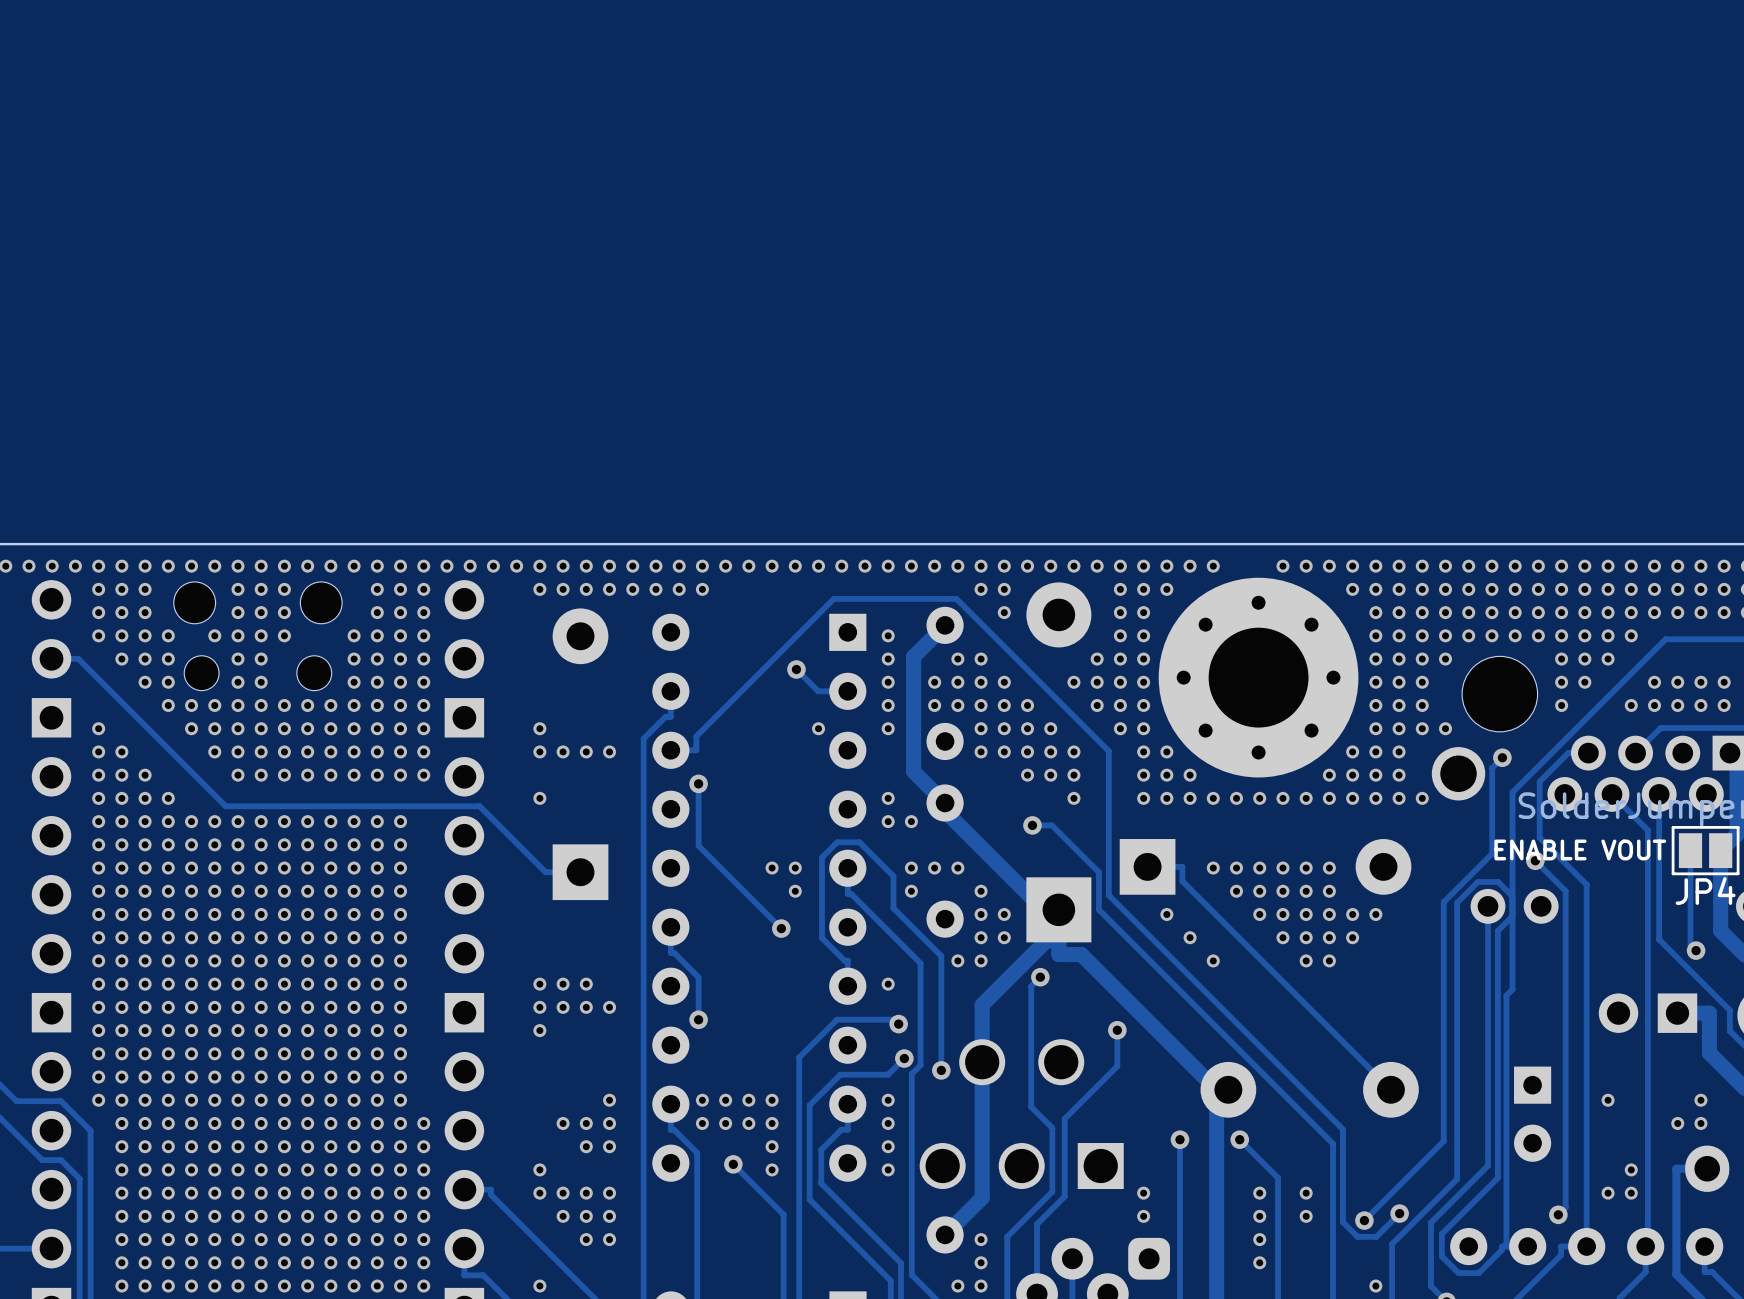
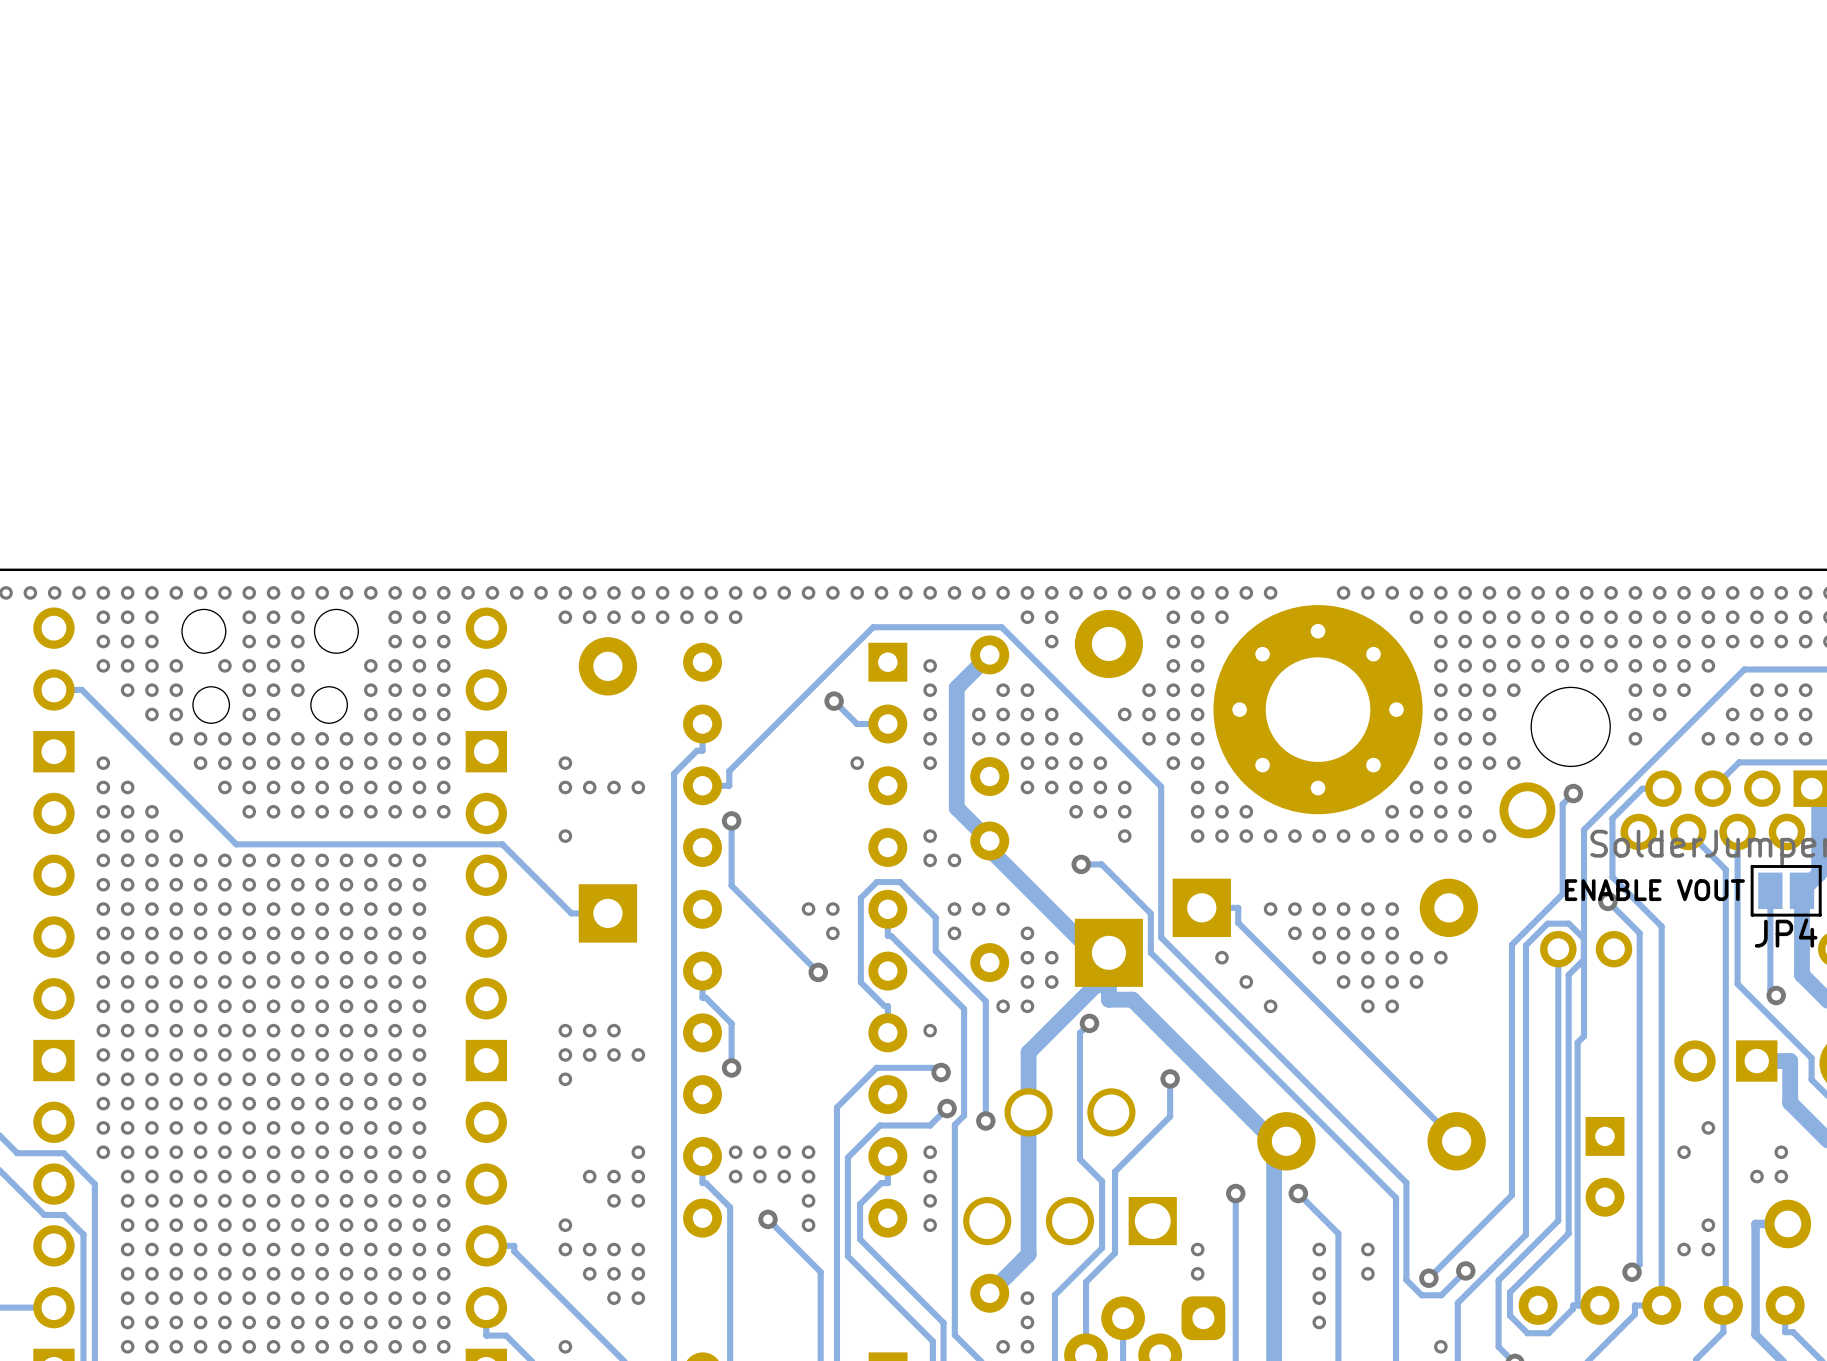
via: none -> (297, 690)
via: none -> (1756, 690)
via: none -> (1781, 690)
via: none -> (1805, 690)
via: none -> (1708, 1127)

